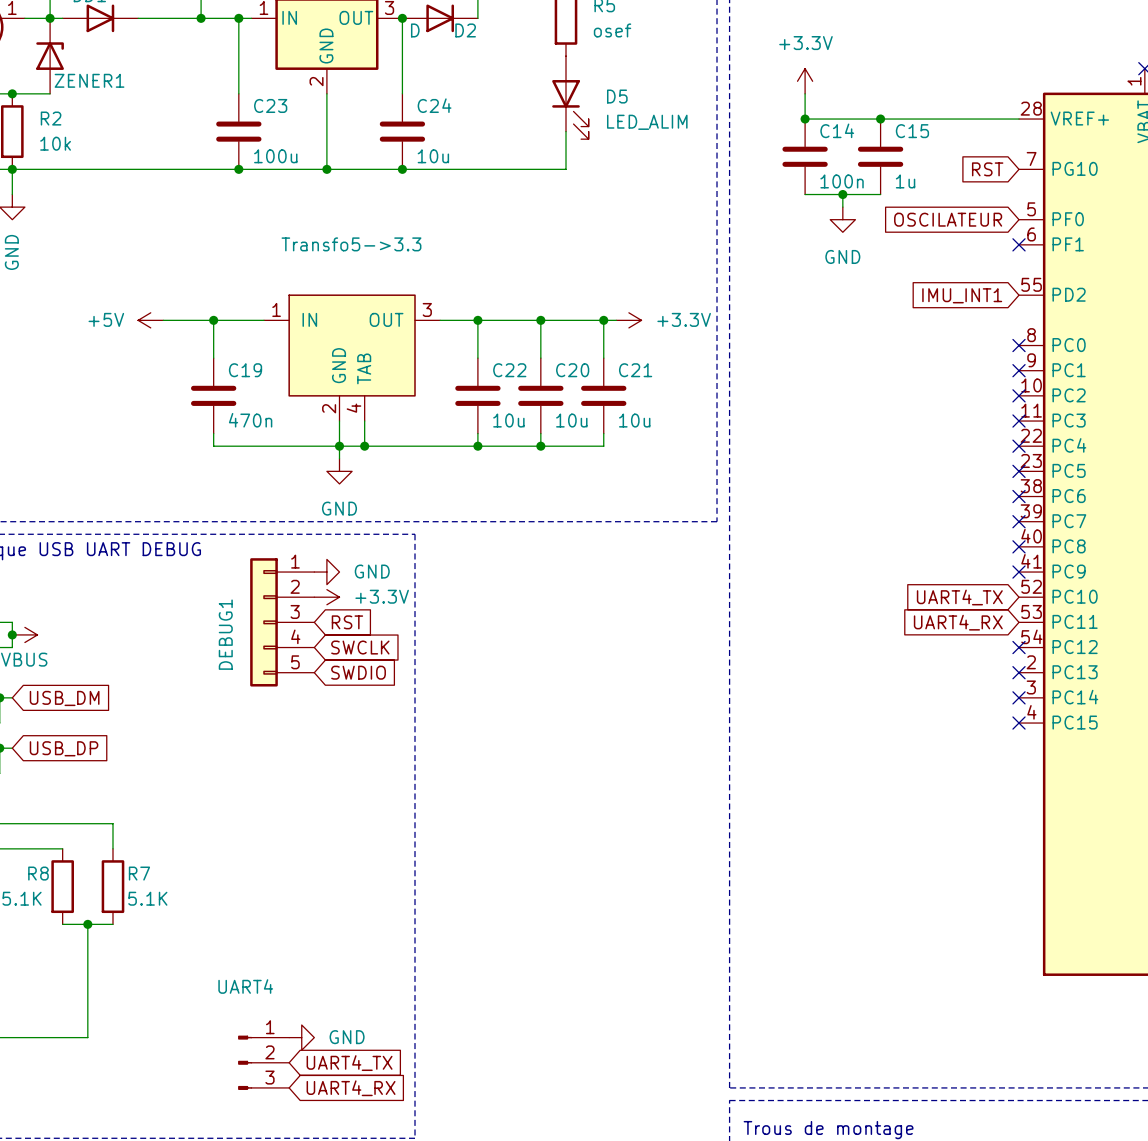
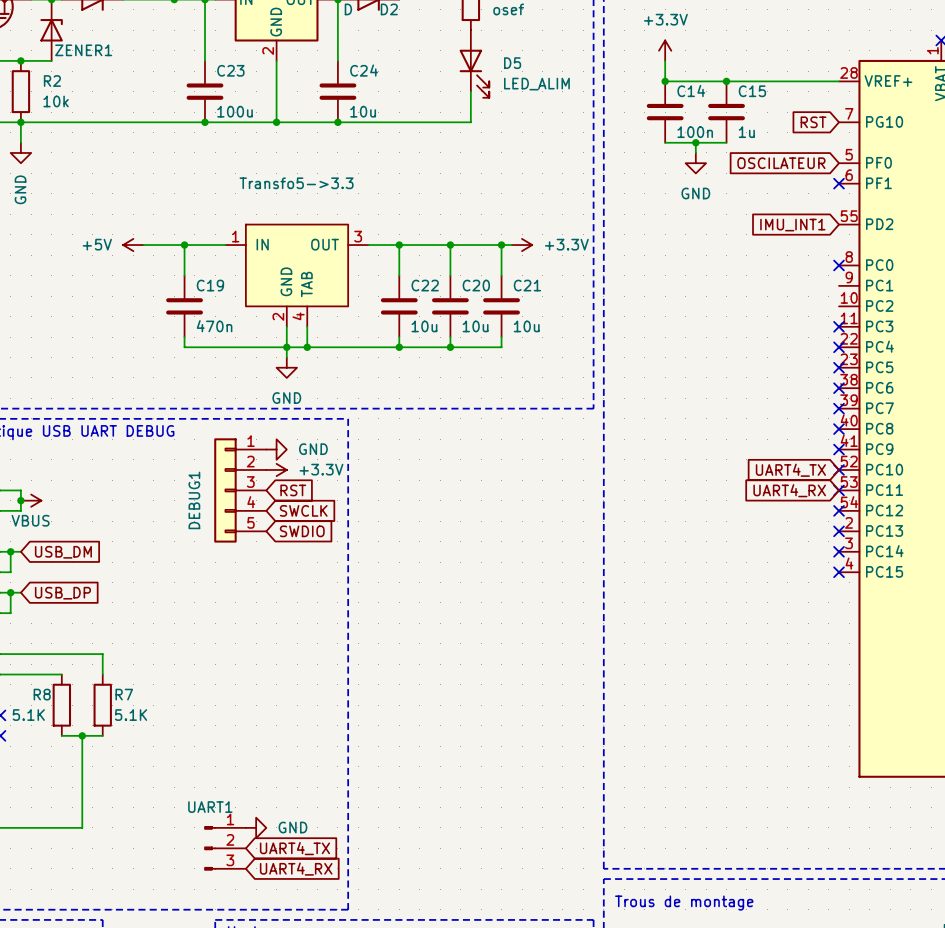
no-connect mark: (1019, 370) -> none
no-connect mark: (1019, 395) -> none
no-connect mark: none -> (839, 469)
no-connect mark: none -> (839, 490)
UART4 name: UART4 (245, 986) -> UART1 (210, 807)

